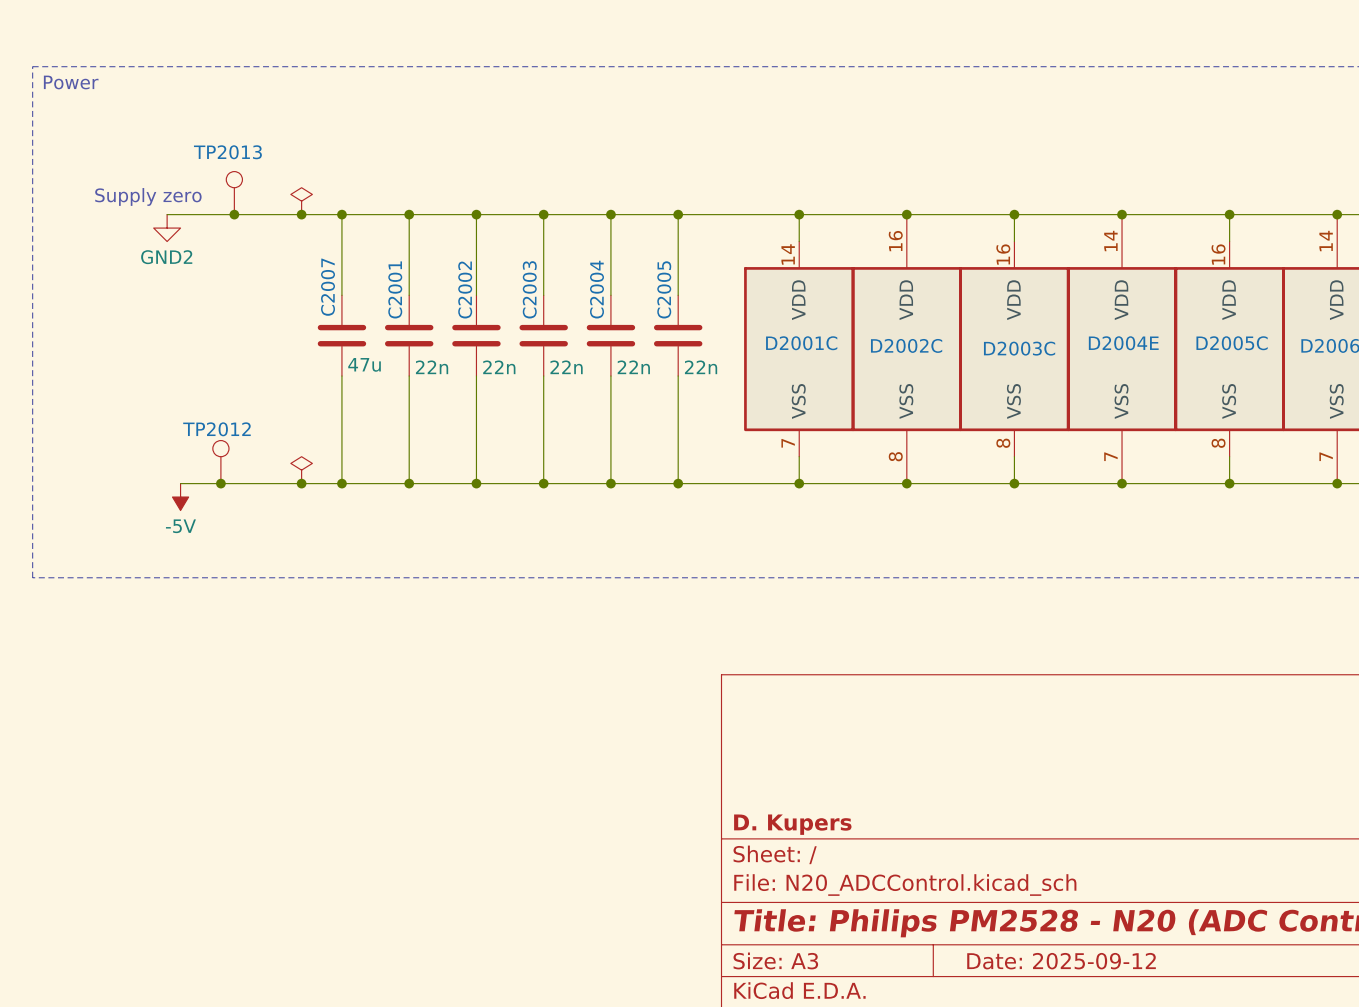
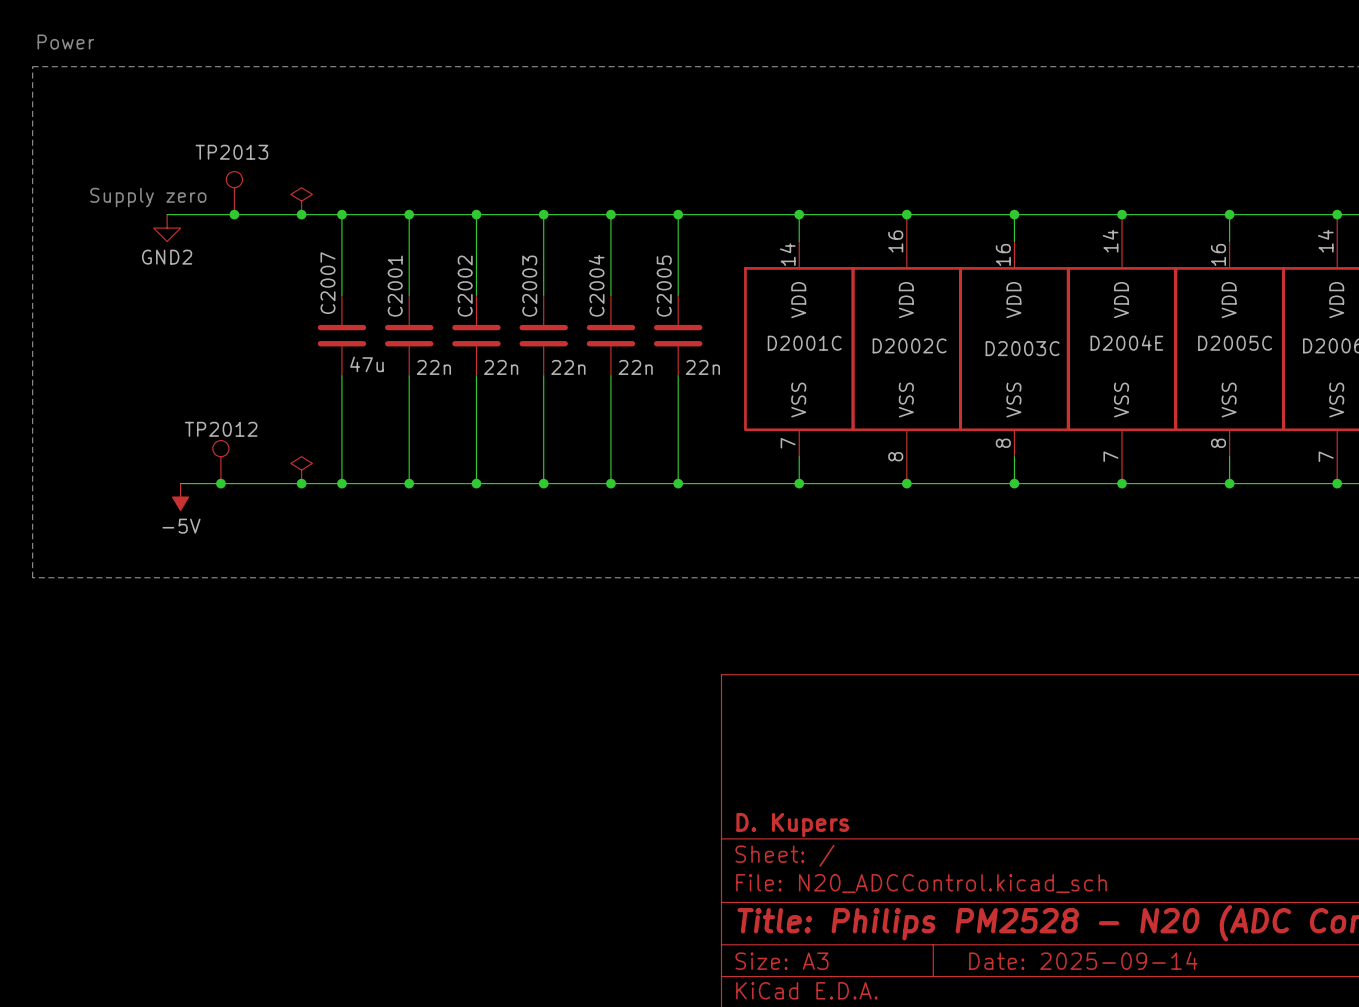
text position: Power (71, 82) -> Power (65, 42)
title block: Date: 2025-09-12 (1061, 961) -> Date: 2025-09-14 (1083, 960)

